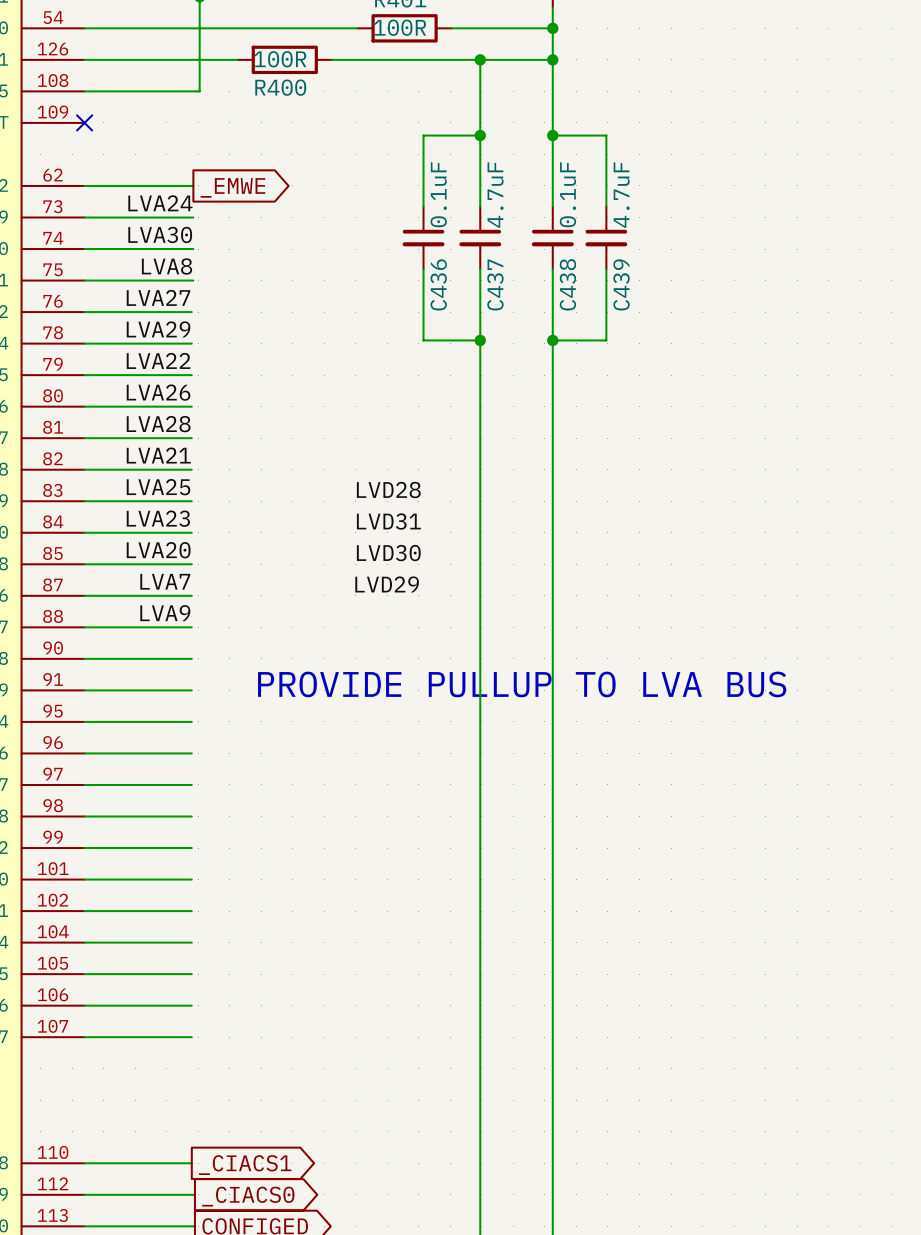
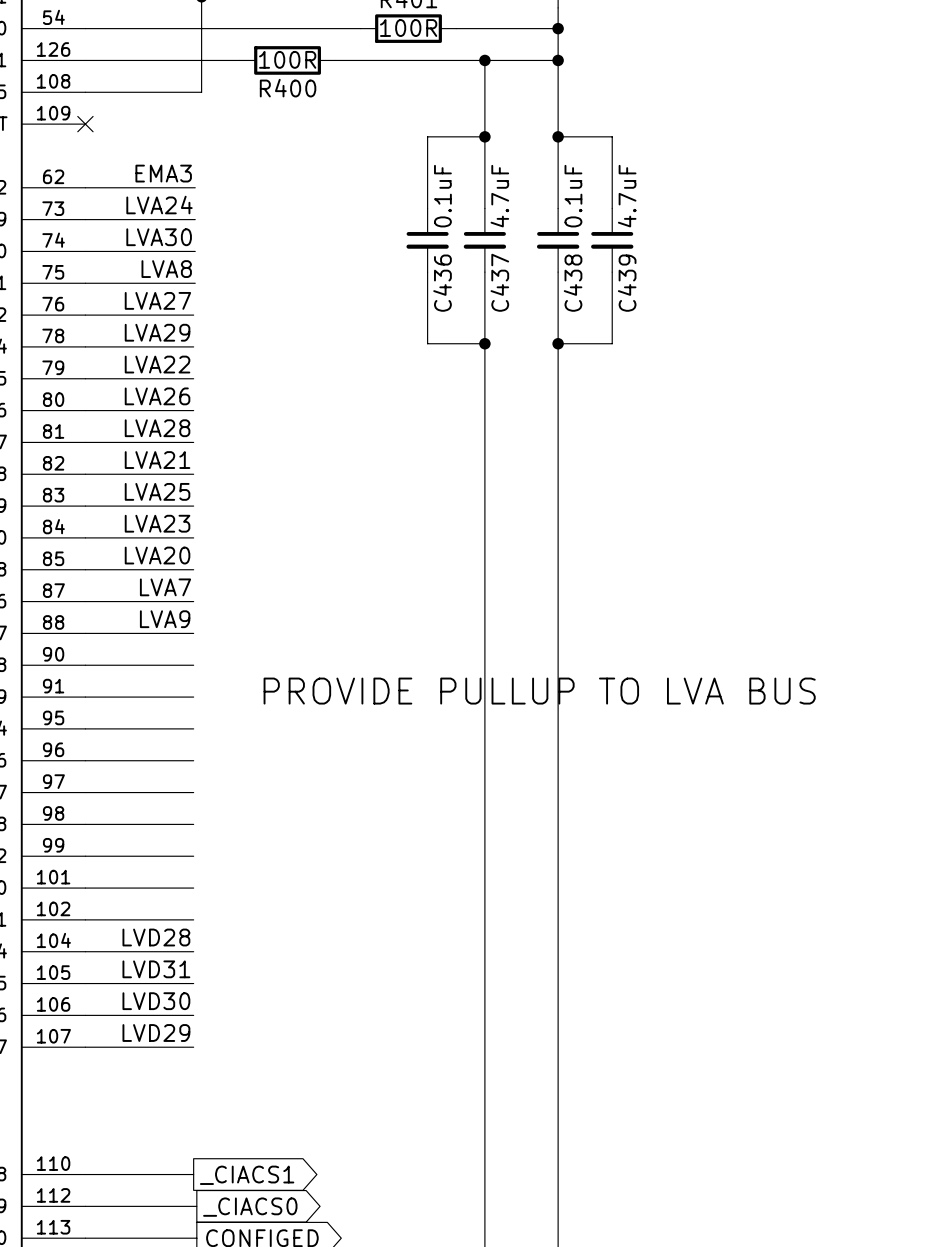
label: none -> EMA3 (163, 173)
global label: _EMWE (232, 187) -> none
label: LVD28 (388, 490) -> none
label: LVD31 (388, 521) -> none
label: LVD30 (388, 553) -> none
label: LVD29 (387, 584) -> none
label: none -> LVD28 (156, 937)
label: none -> LVD31 (156, 969)
label: none -> LVD30 (156, 1001)
label: none -> LVD29 (156, 1033)

